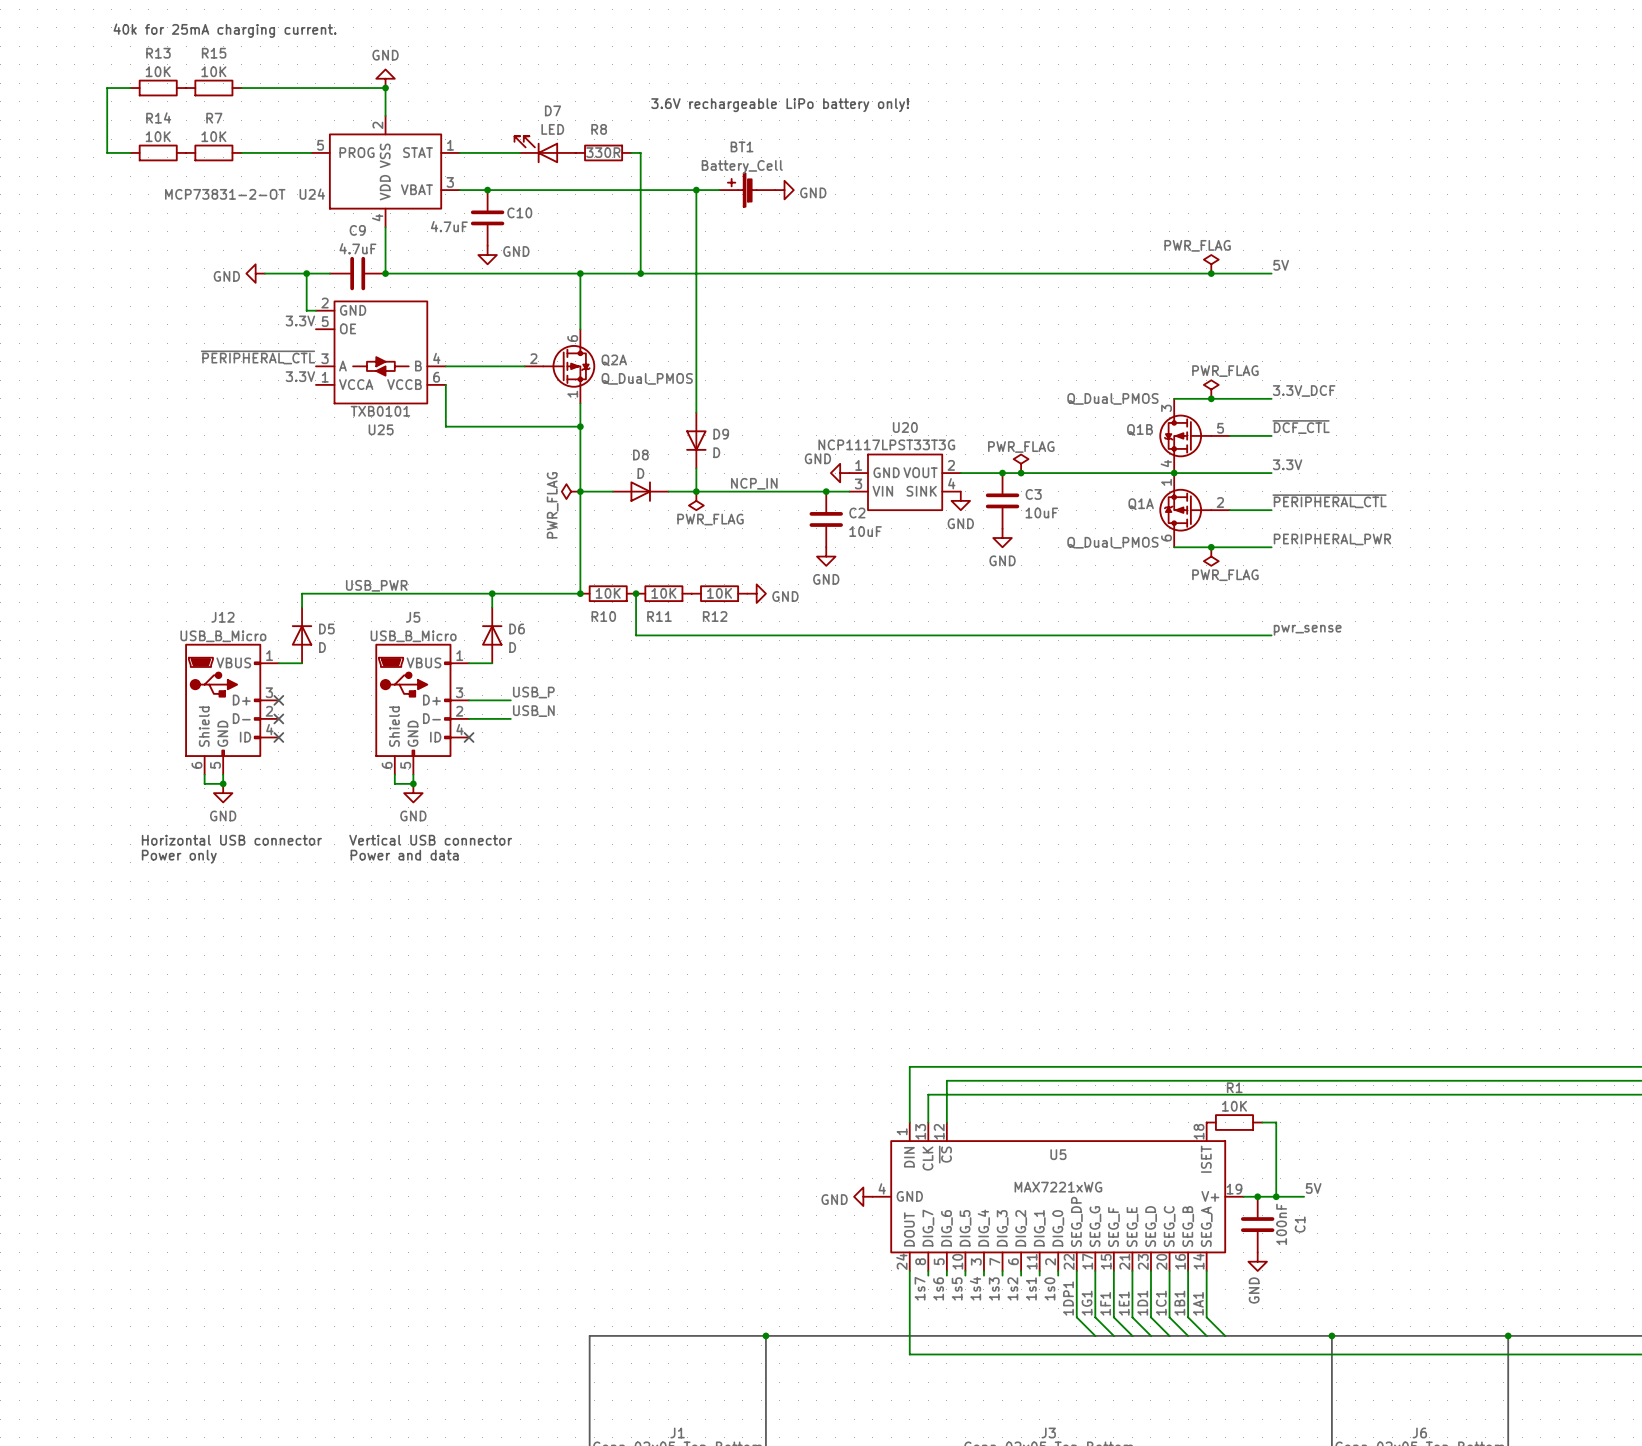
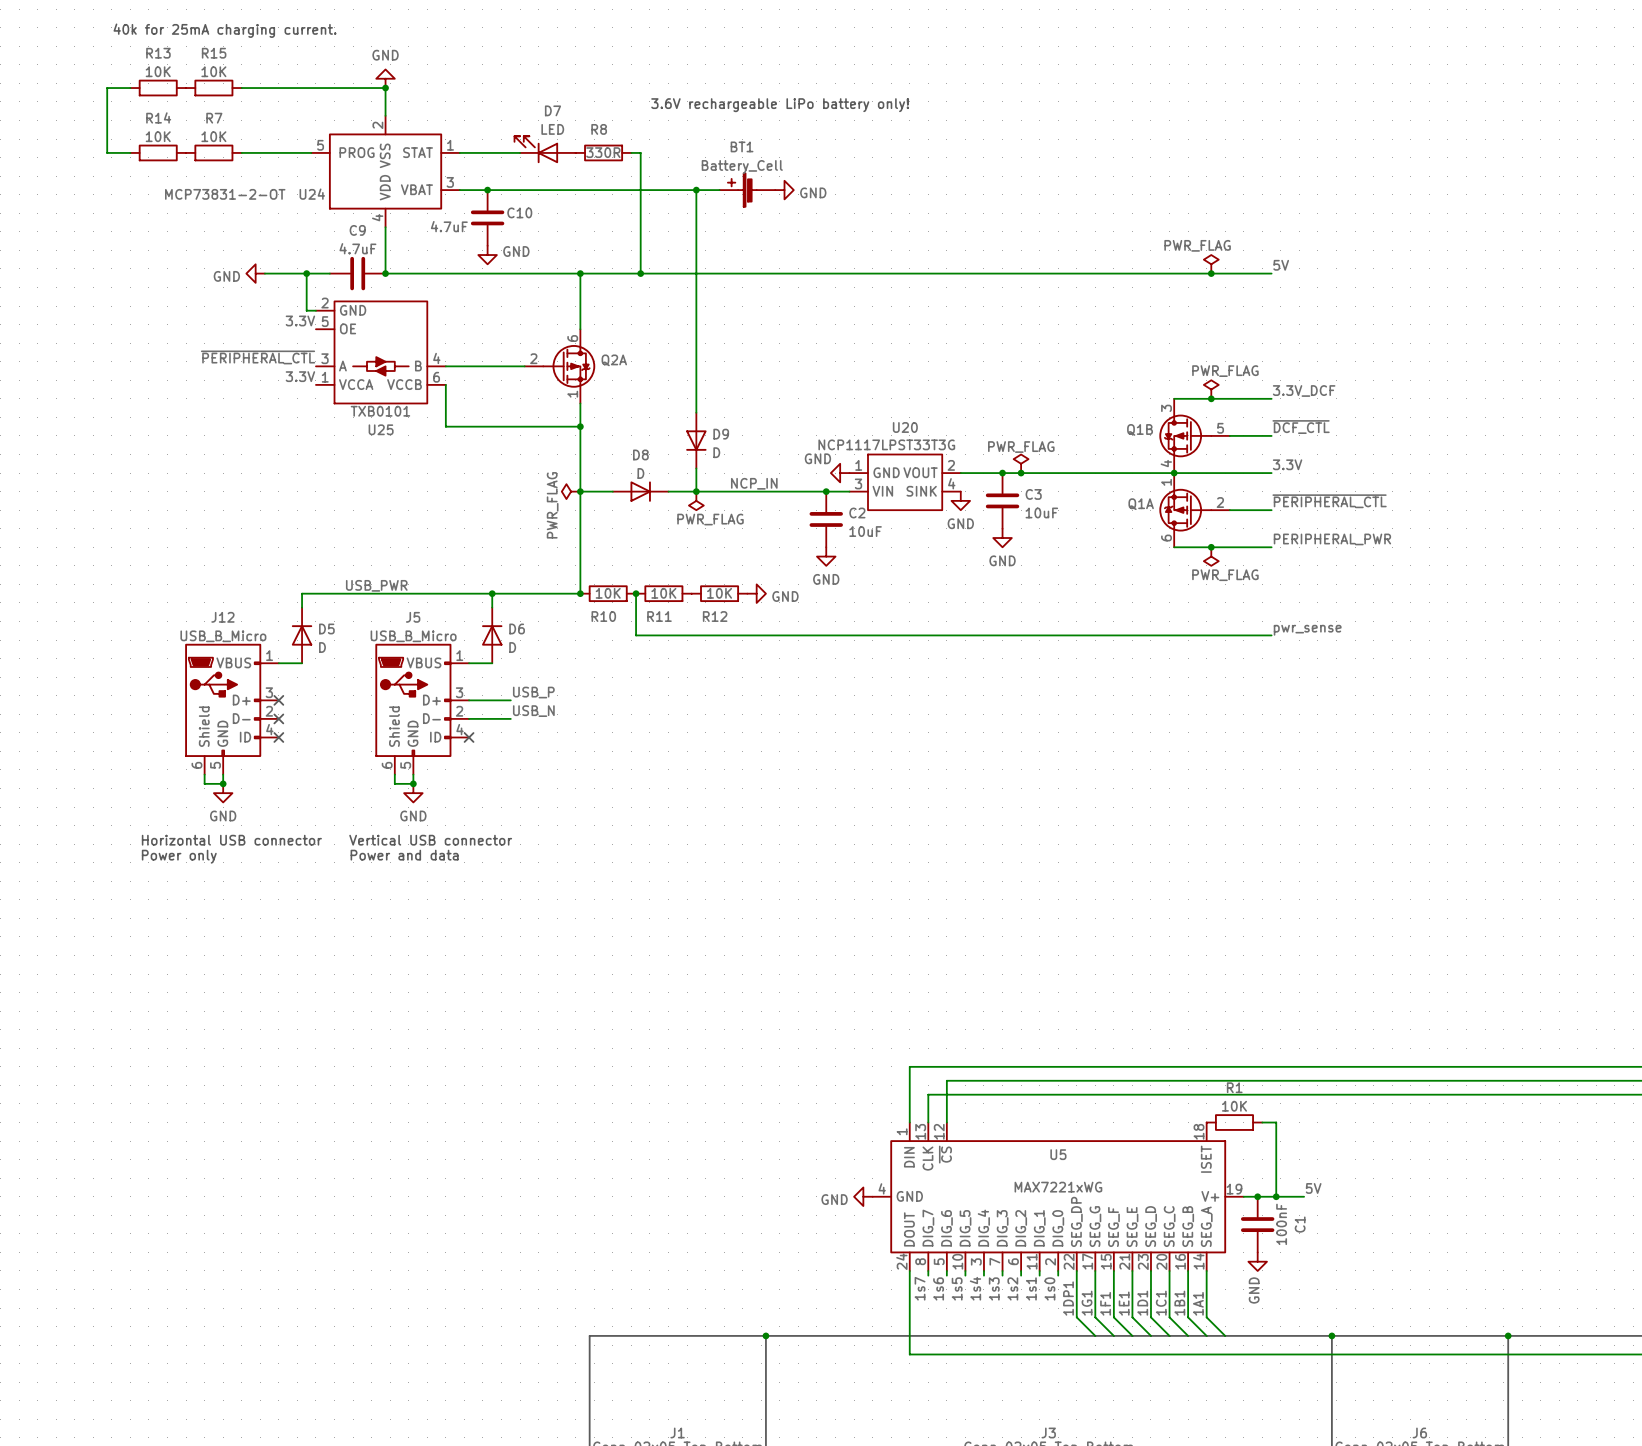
Q2A value: Q_Dual_PMOS (647, 378) -> none
Q1B value: Q_Dual_PMOS (1112, 398) -> none
Q1A value: Q_Dual_PMOS (1112, 542) -> none

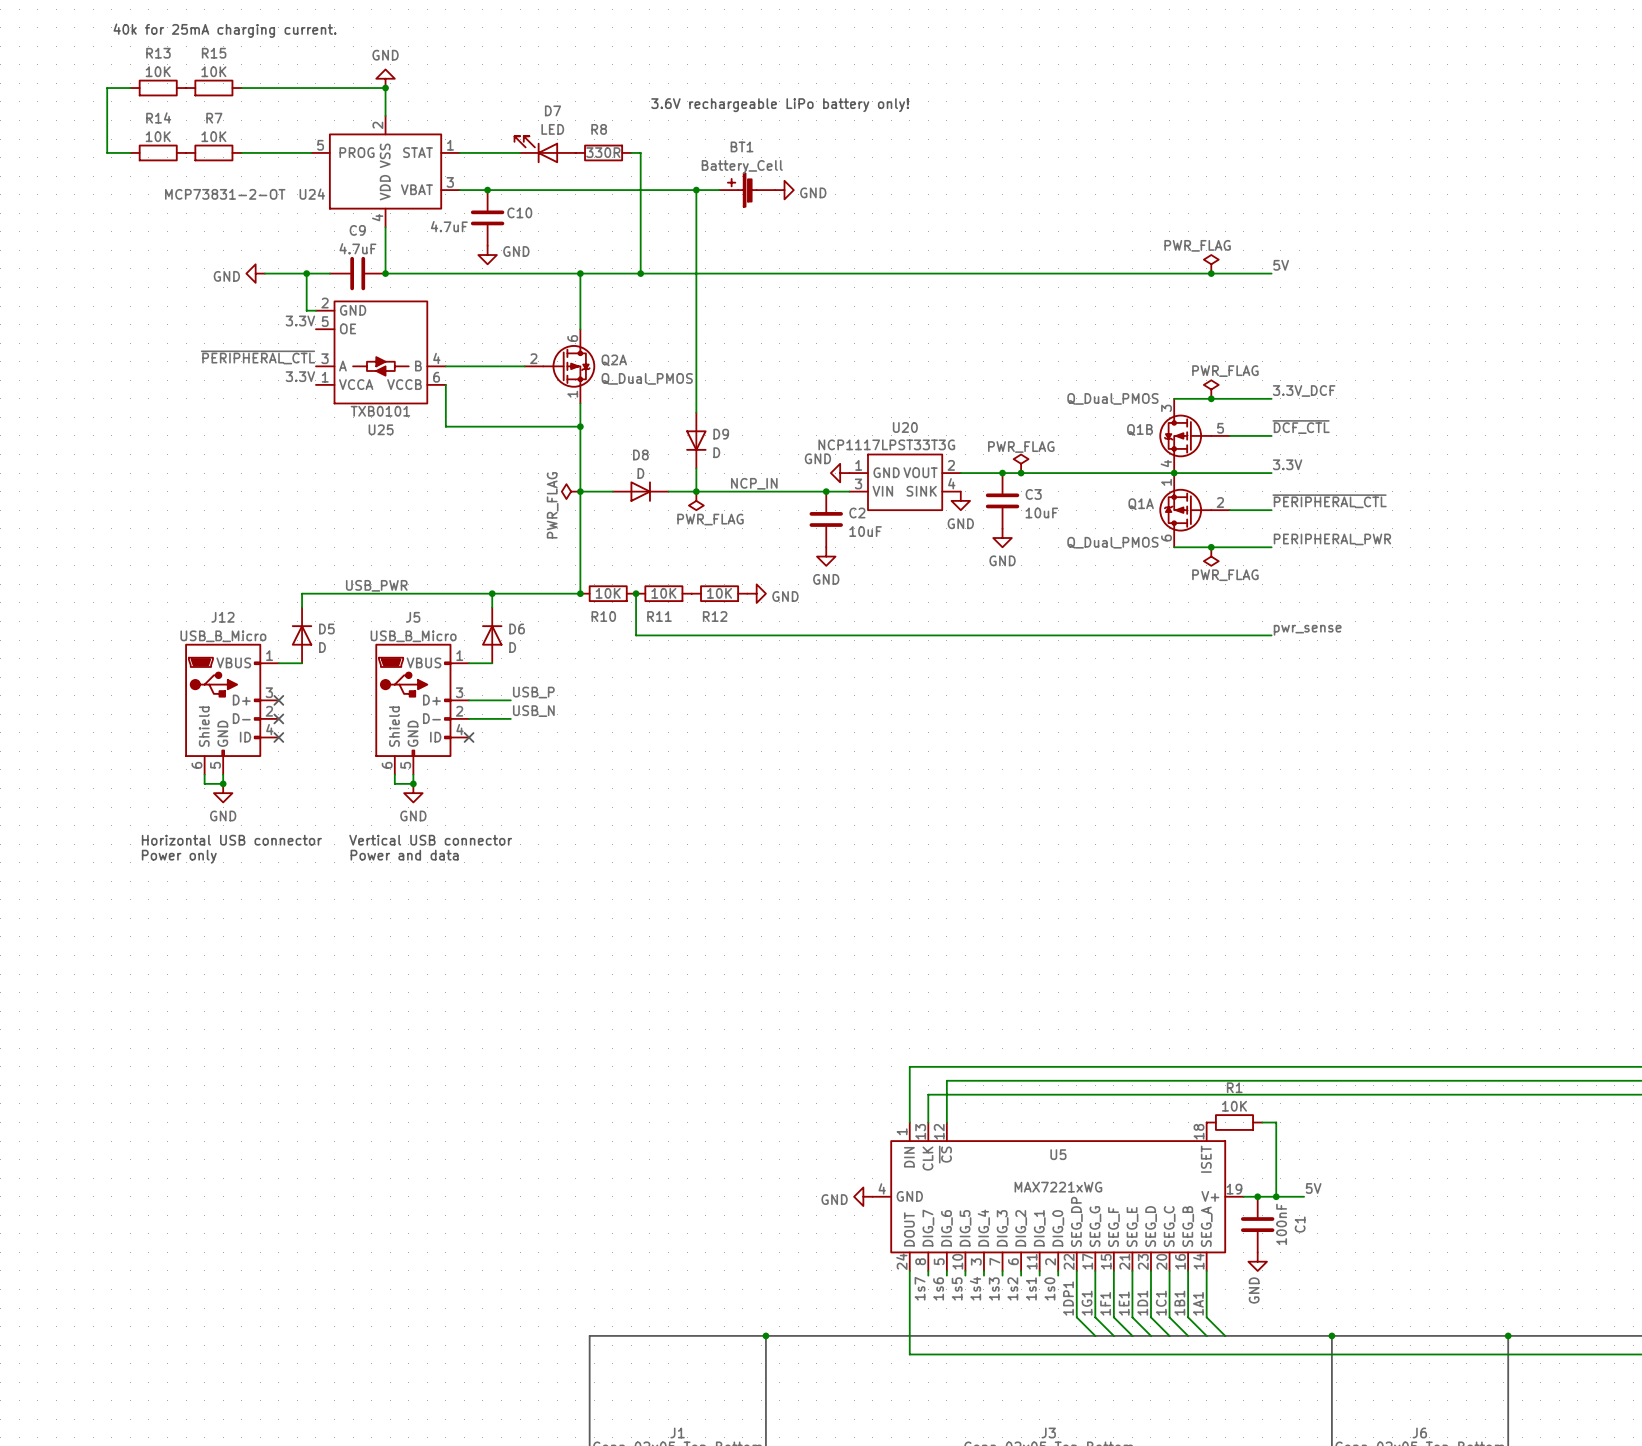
Q2A value: none -> Q_Dual_PMOS (647, 378)
Q1B value: none -> Q_Dual_PMOS (1112, 398)
Q1A value: none -> Q_Dual_PMOS (1112, 542)

